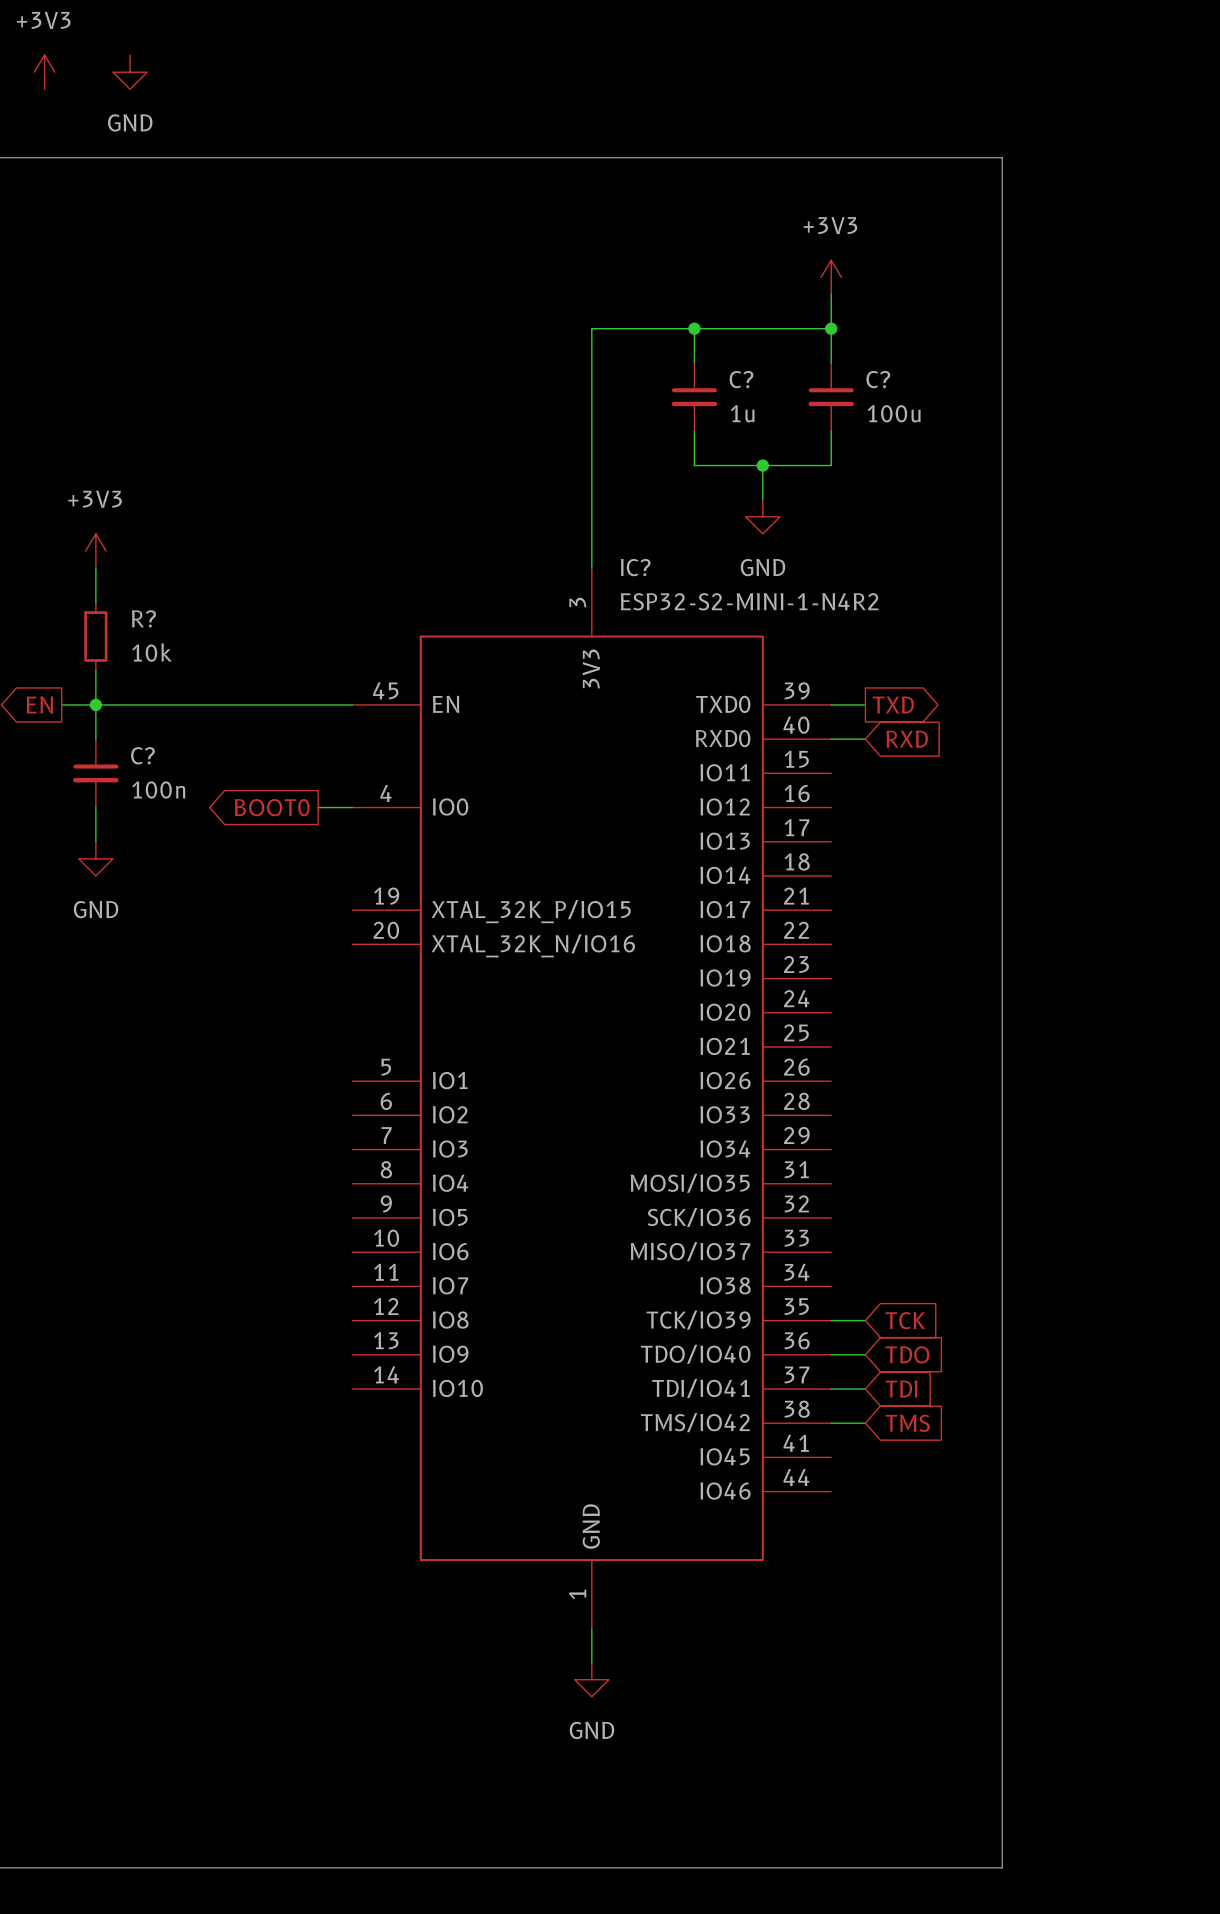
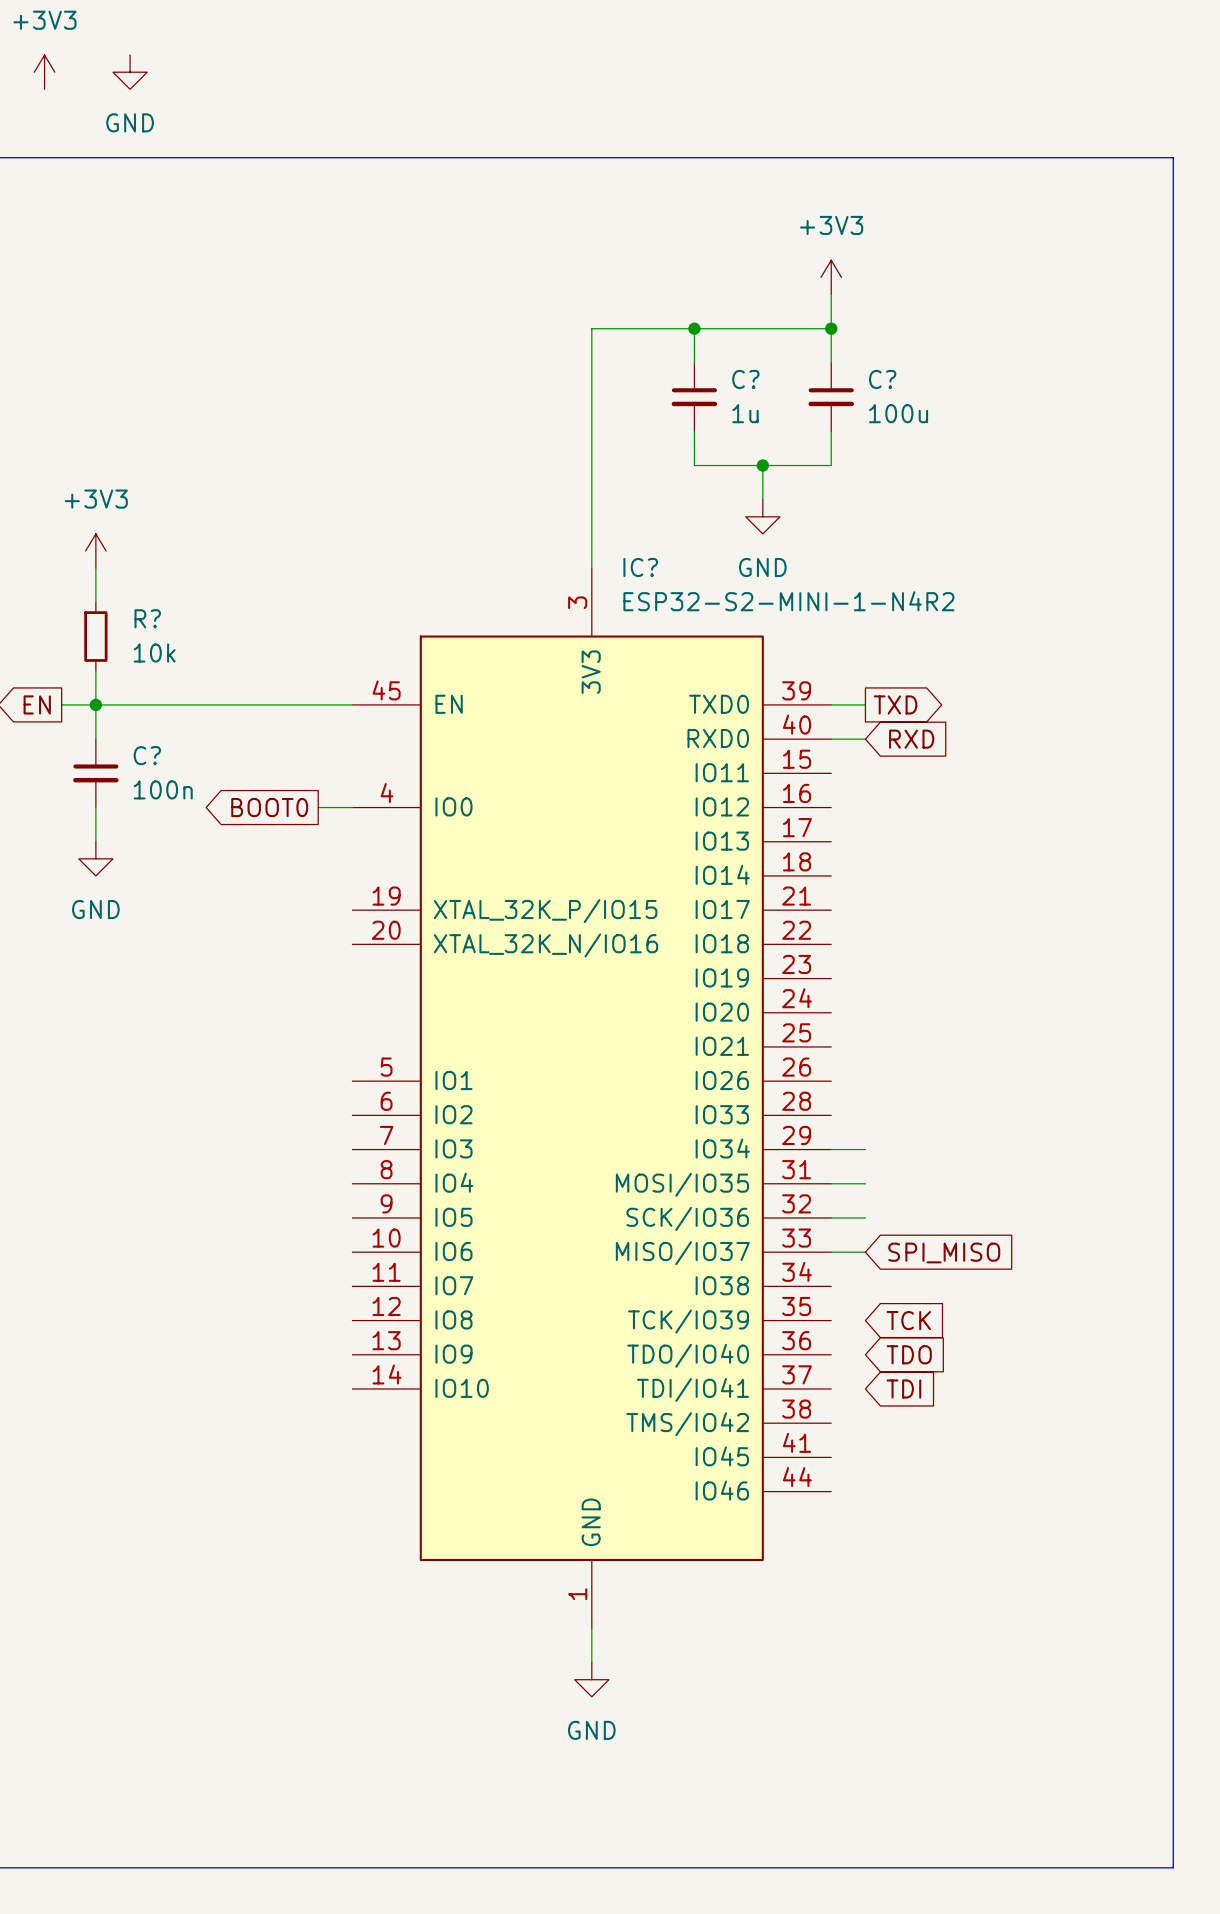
line: (1002, 157) (1002, 1867) -> (1002, 157) (1173, 157) (1173, 1867) (1002, 1867)
global label: none -> SPI_MISO (944, 1252)
wire: (831, 1320) (865, 1320) -> (831, 1149) (865, 1149)
wire: (831, 1354) (865, 1354) -> (831, 1183) (865, 1183)
wire: (831, 1388) (865, 1388) -> (831, 1217) (865, 1217)
wire: (831, 1423) (865, 1423) -> (831, 1252) (865, 1252)
global label: TMS (907, 1423) -> none

